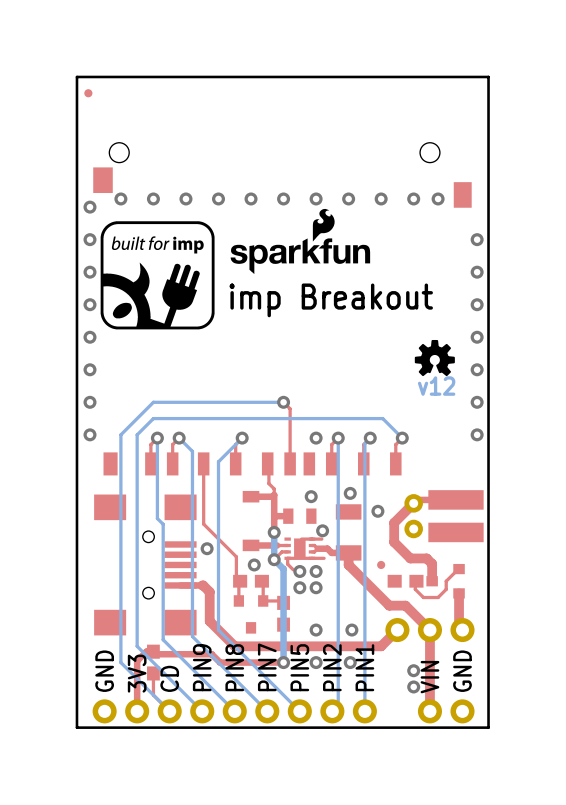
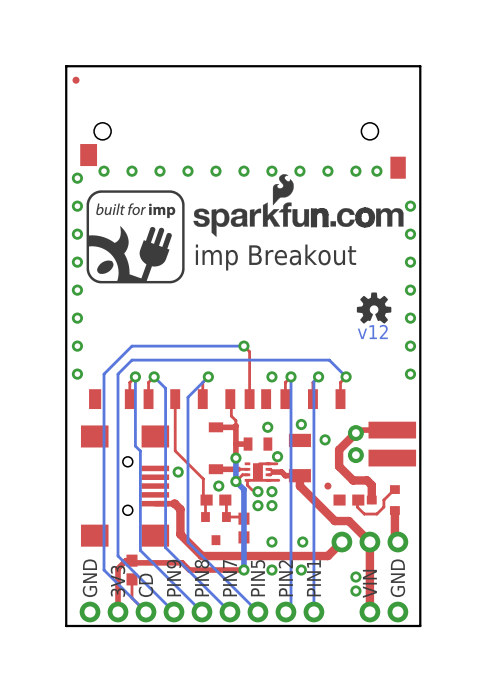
drawing: none -> [193, 174, 404, 237]
drawing: [230, 208, 371, 275] -> none

